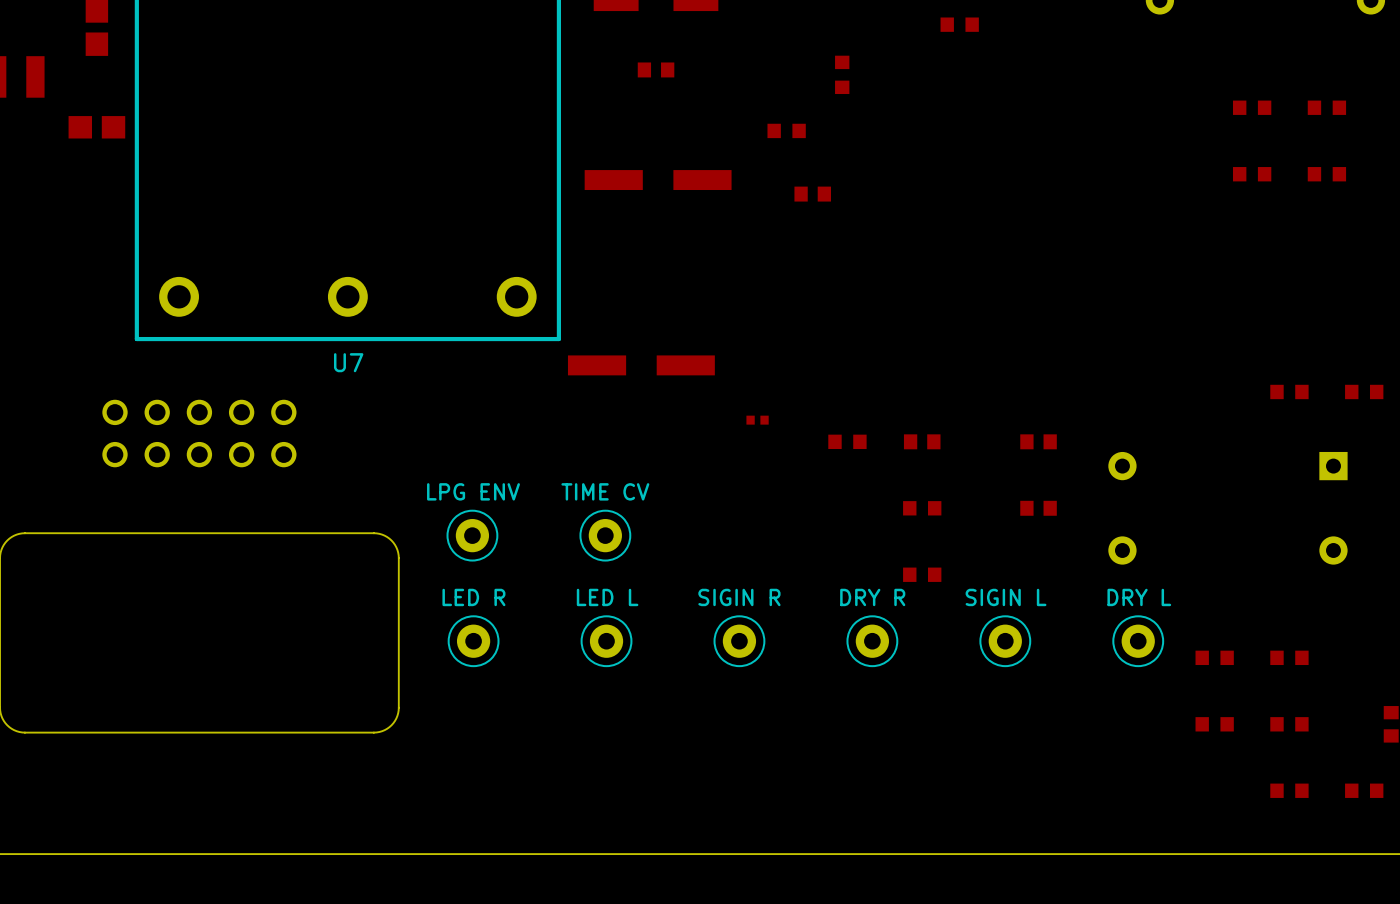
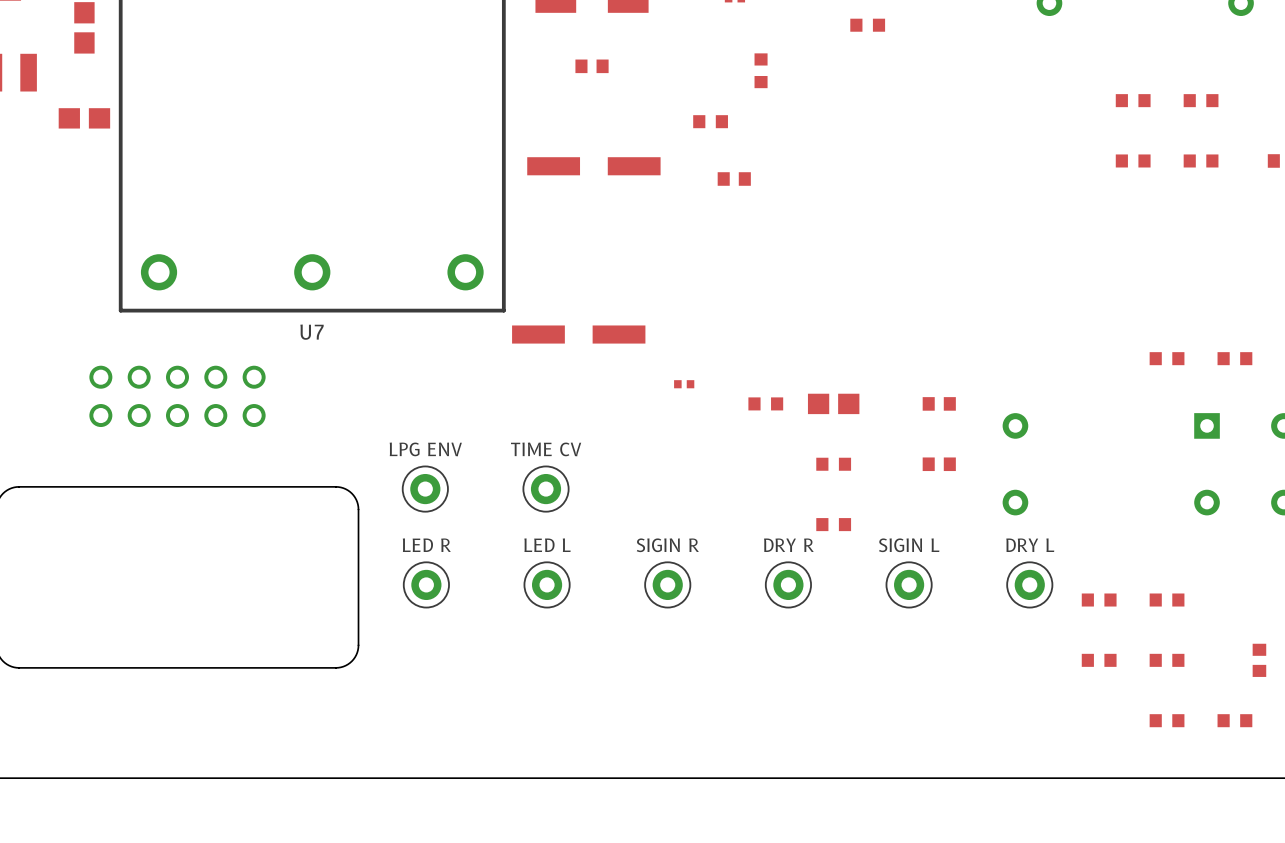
part footprint: [903, 434, 941, 450] -> [807, 393, 860, 415]

